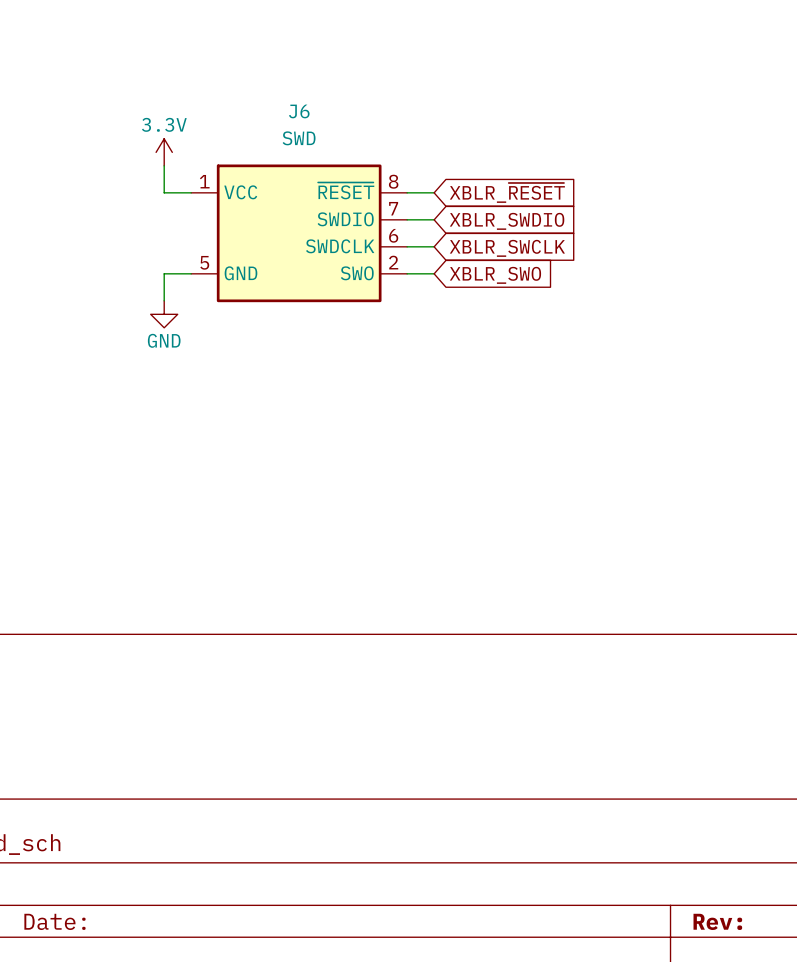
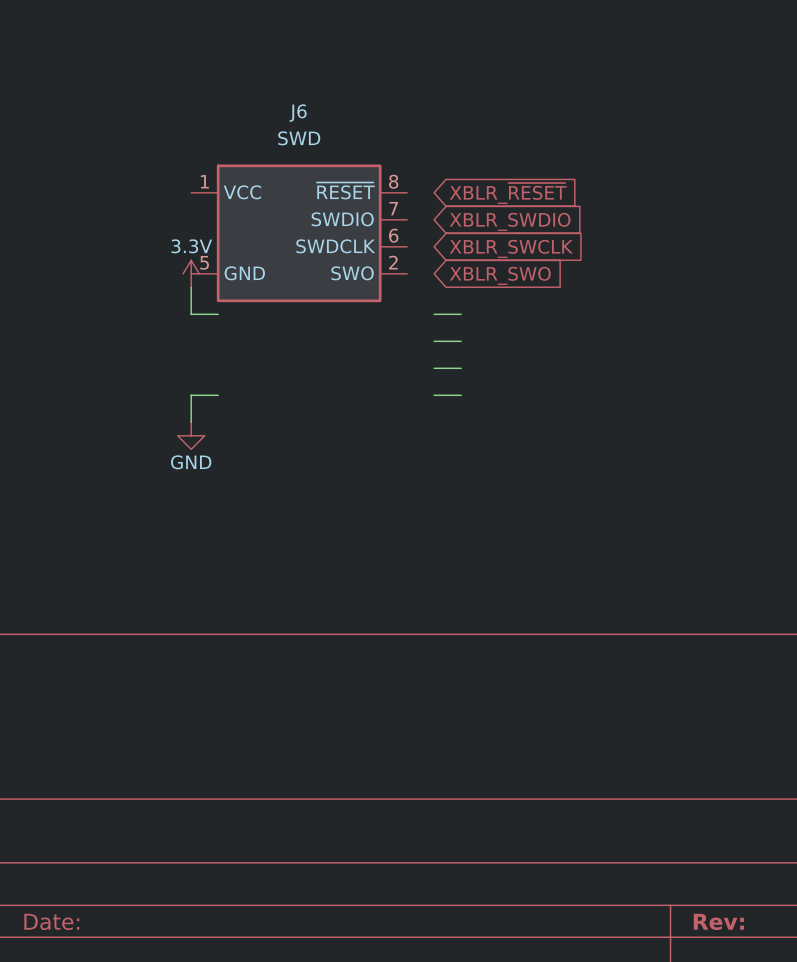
power symbol position: 3.3V (164, 152) -> 3.3V (191, 273)
wire: (164, 165) (164, 192) (191, 192) -> (191, 287) (191, 314) (218, 314)
wire: (407, 192) (434, 192) -> (434, 314) (461, 314)
wire: (407, 219) (434, 219) -> (434, 341) (461, 341)
wire: (407, 246) (434, 246) -> (434, 368) (461, 368)
wire: (191, 273) (164, 273) (164, 300) -> (218, 395) (191, 395) (191, 422)
wire: (407, 273) (434, 273) -> (434, 395) (461, 395)
power symbol position: GND (164, 314) -> GND (191, 435)

